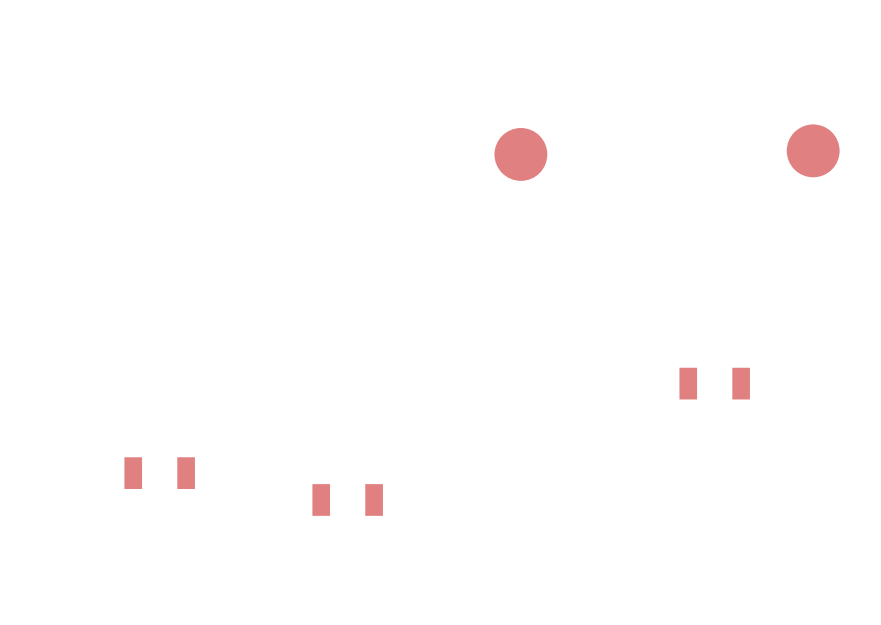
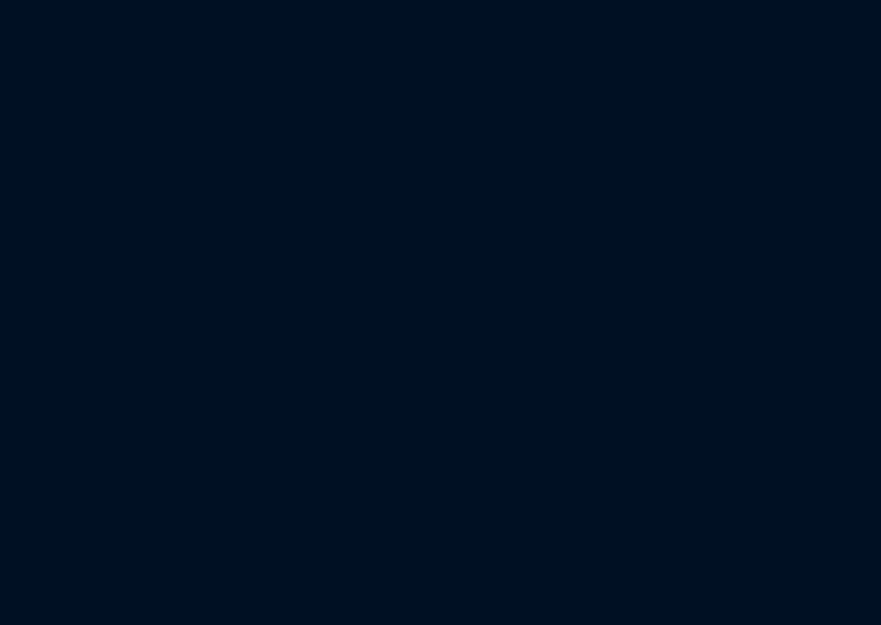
part: (813, 150) -> none
part: (520, 154) -> none
part: (714, 383) -> none
part: (159, 473) -> none
part: (347, 499) -> none

